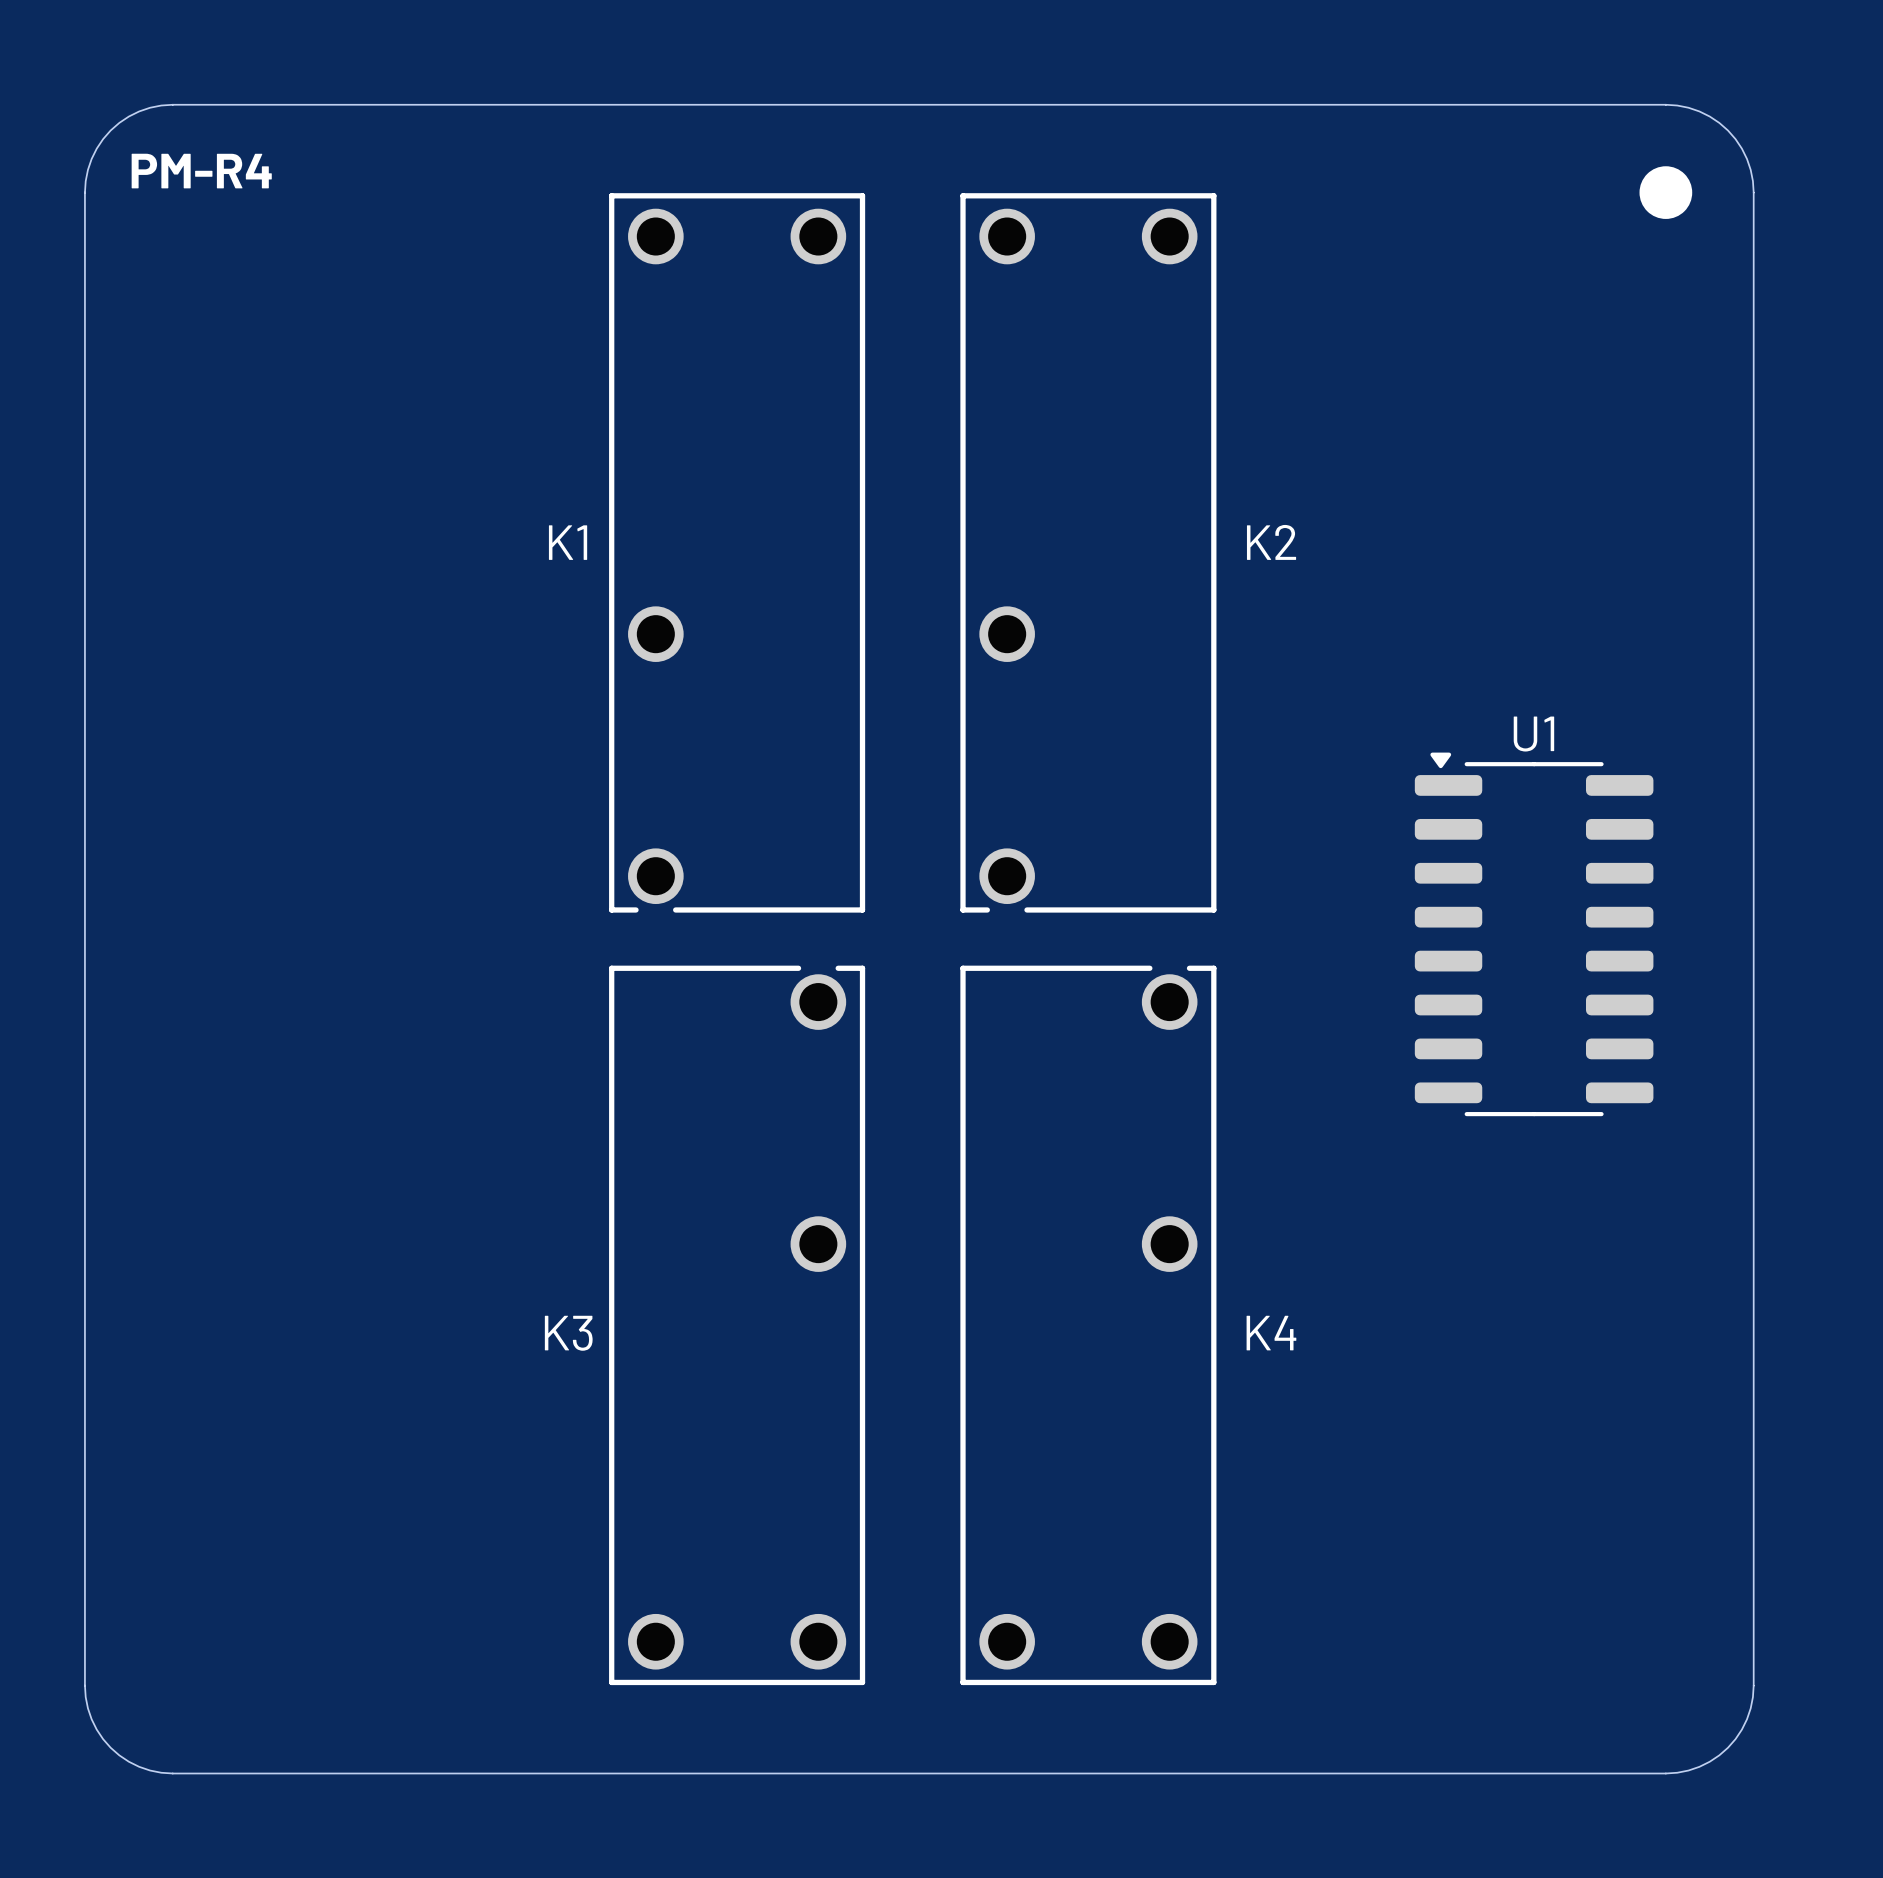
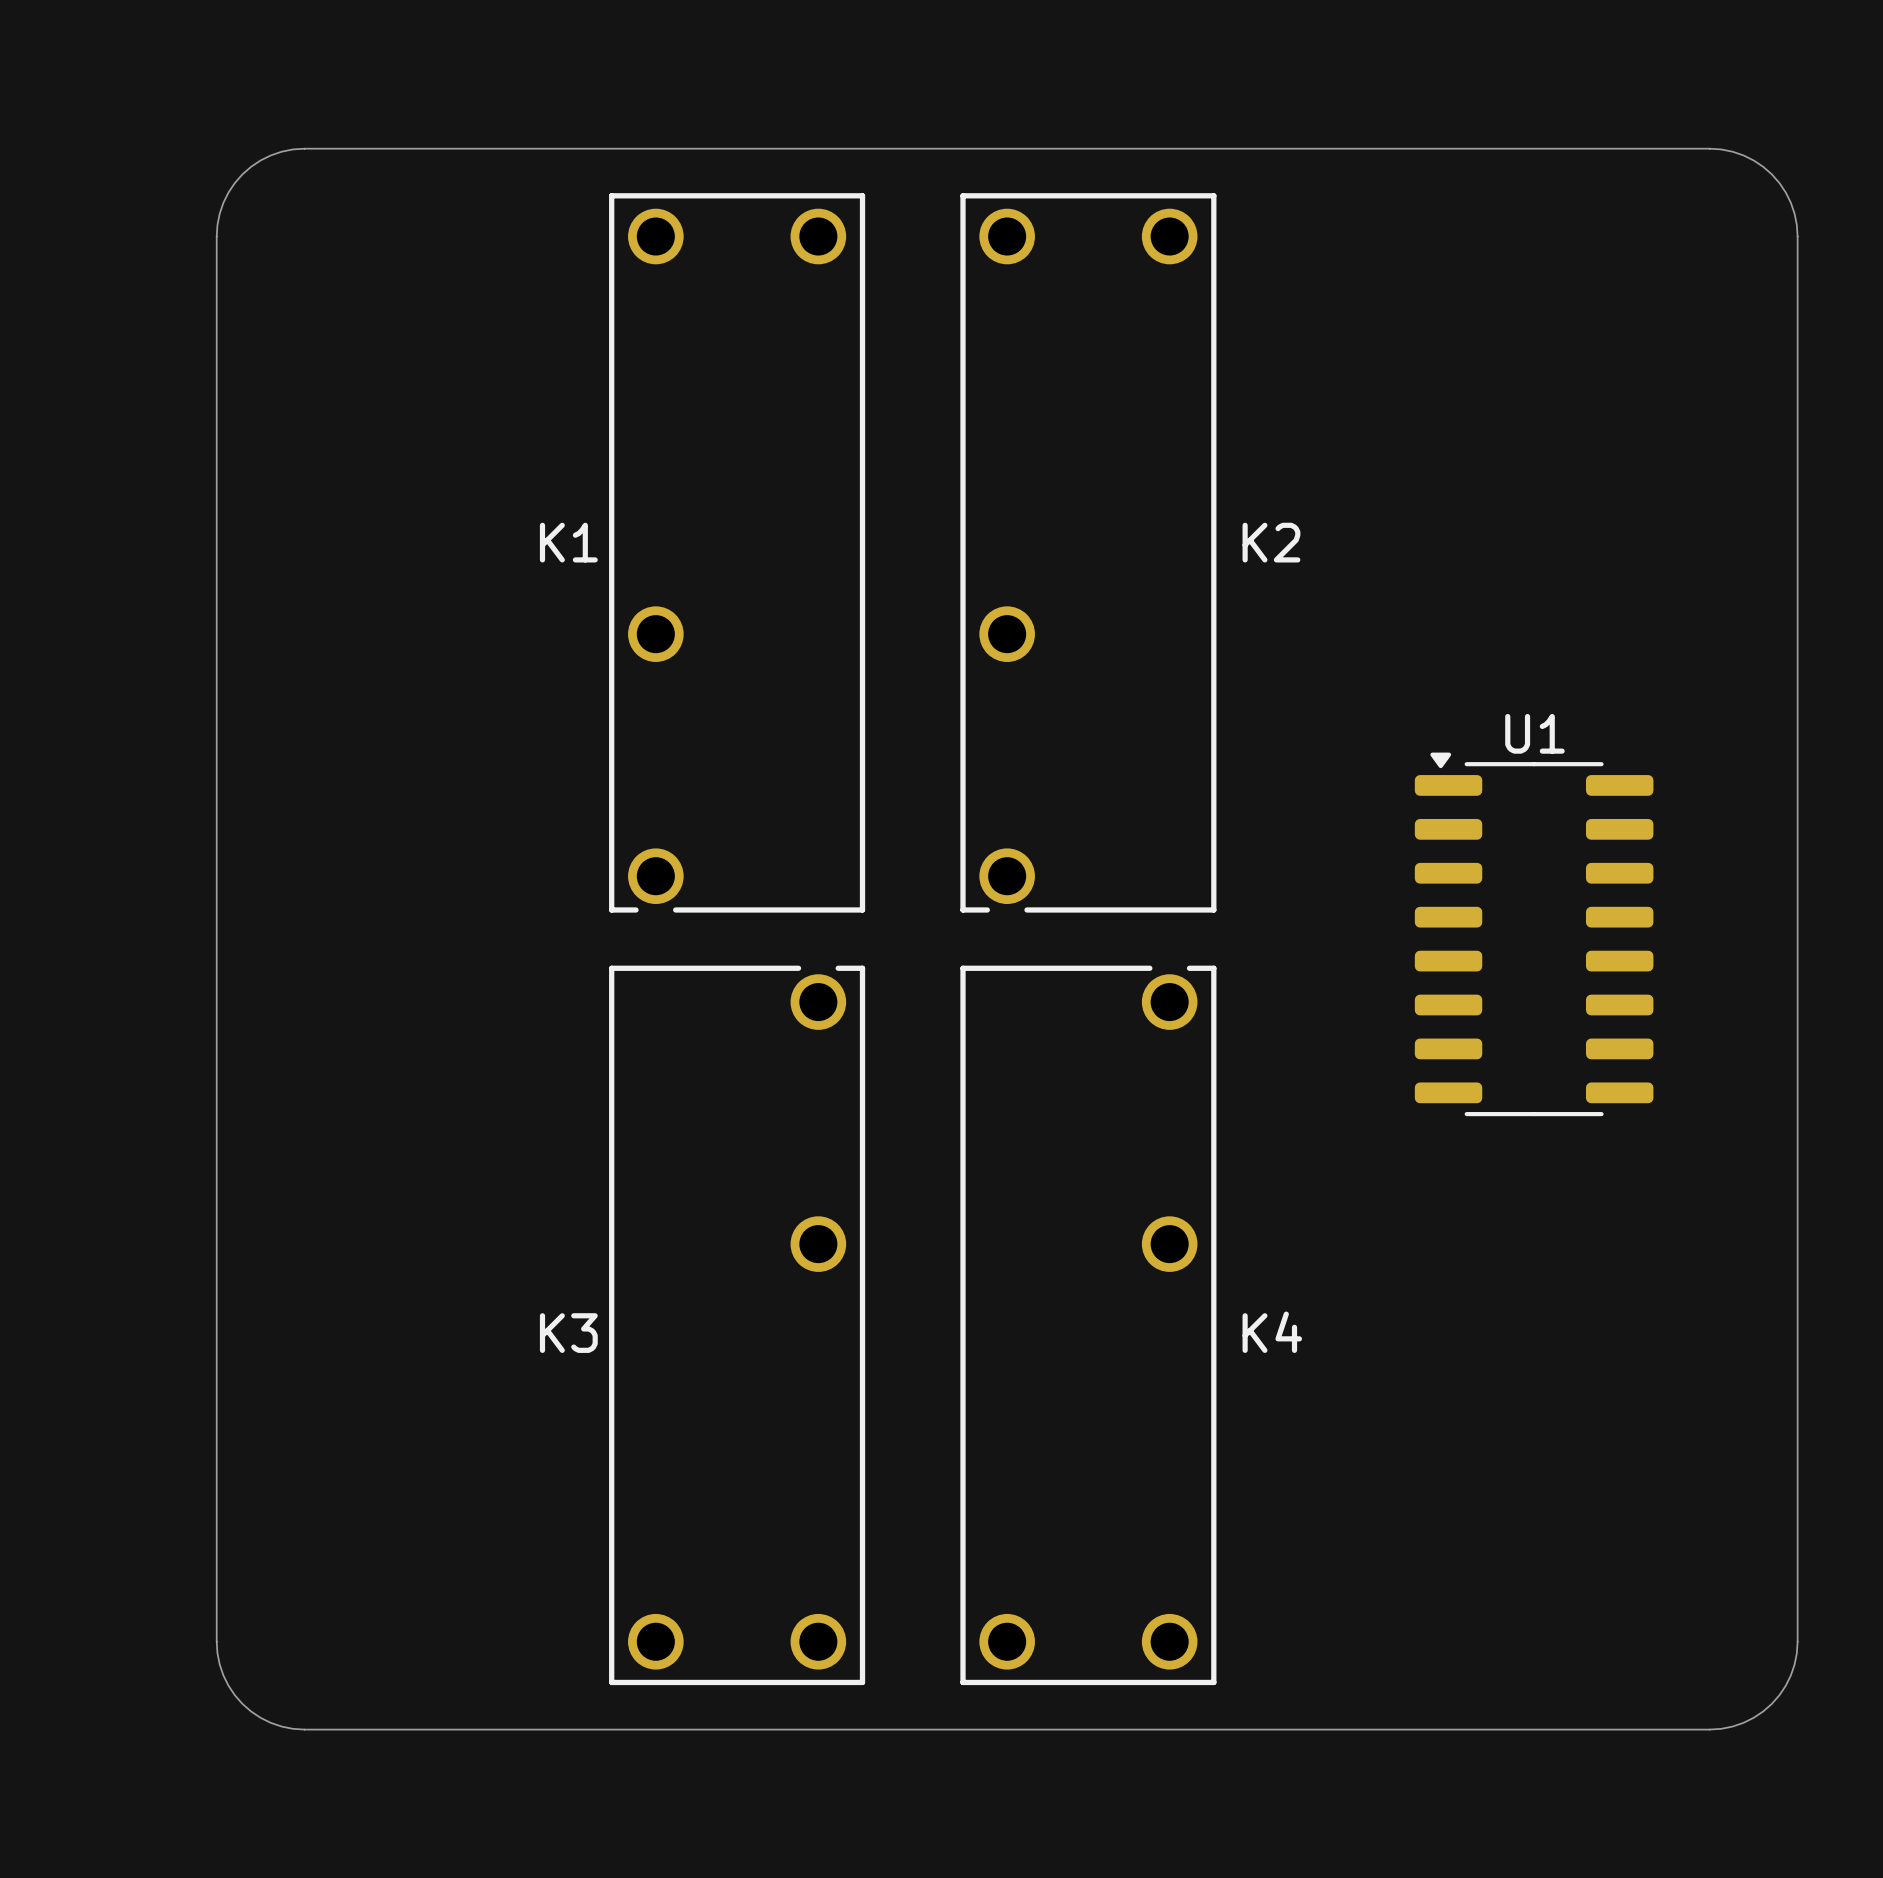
board edge: (172, 104) (1665, 104) (1688, 107) (1699, 111) (1727, 130) (1747, 158) (1750, 169) (1753, 192) (1753, 1685) (1750, 1708) (1747, 1719) (1727, 1747) (1699, 1766) (1688, 1770) (1665, 1773) (172, 1773) (150, 1770) (139, 1766) (110, 1747) (91, 1719) (87, 1708) (84, 1685) (84, 192) (87, 169) (91, 158) (110, 130) (139, 111) (150, 107) (172, 104) -> (304, 148) (270, 155) (242, 174) (223, 202) (216, 236) (216, 1641) (223, 1675) (242, 1703) (270, 1722) (304, 1729) (1709, 1729) (1743, 1722) (1771, 1703) (1790, 1675) (1797, 1641) (1797, 236) (1790, 202) (1771, 174) (1743, 155) (1709, 148) (304, 148)
drawing: [1639, 166, 1693, 219] -> none
text: PM-R4 (201, 171) -> none

